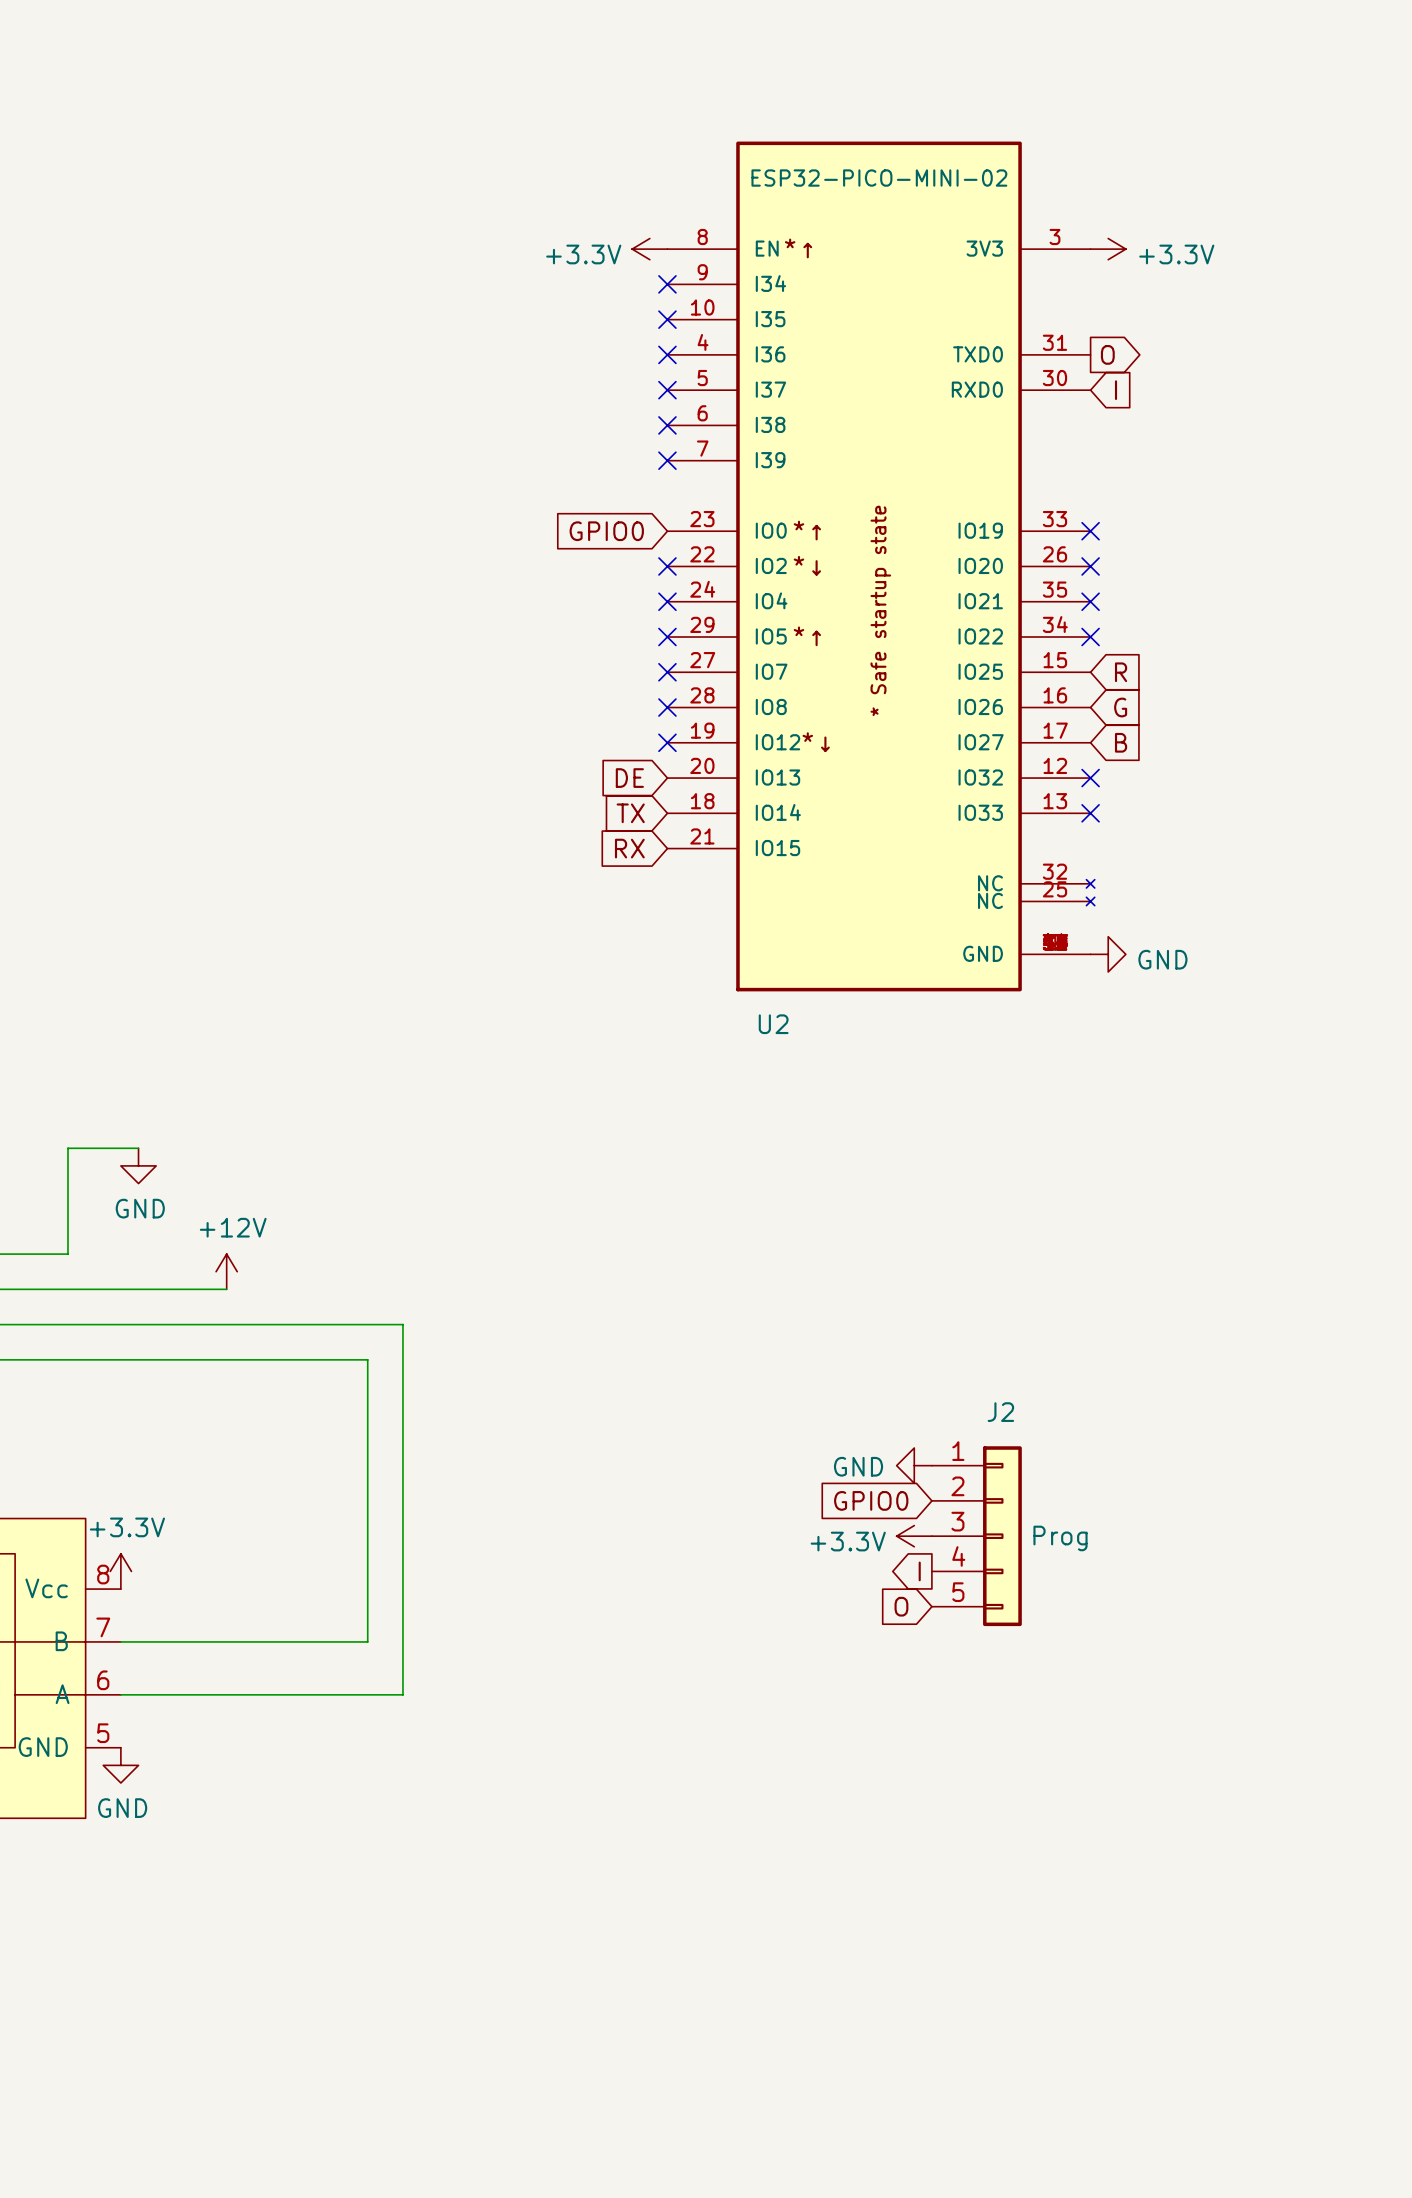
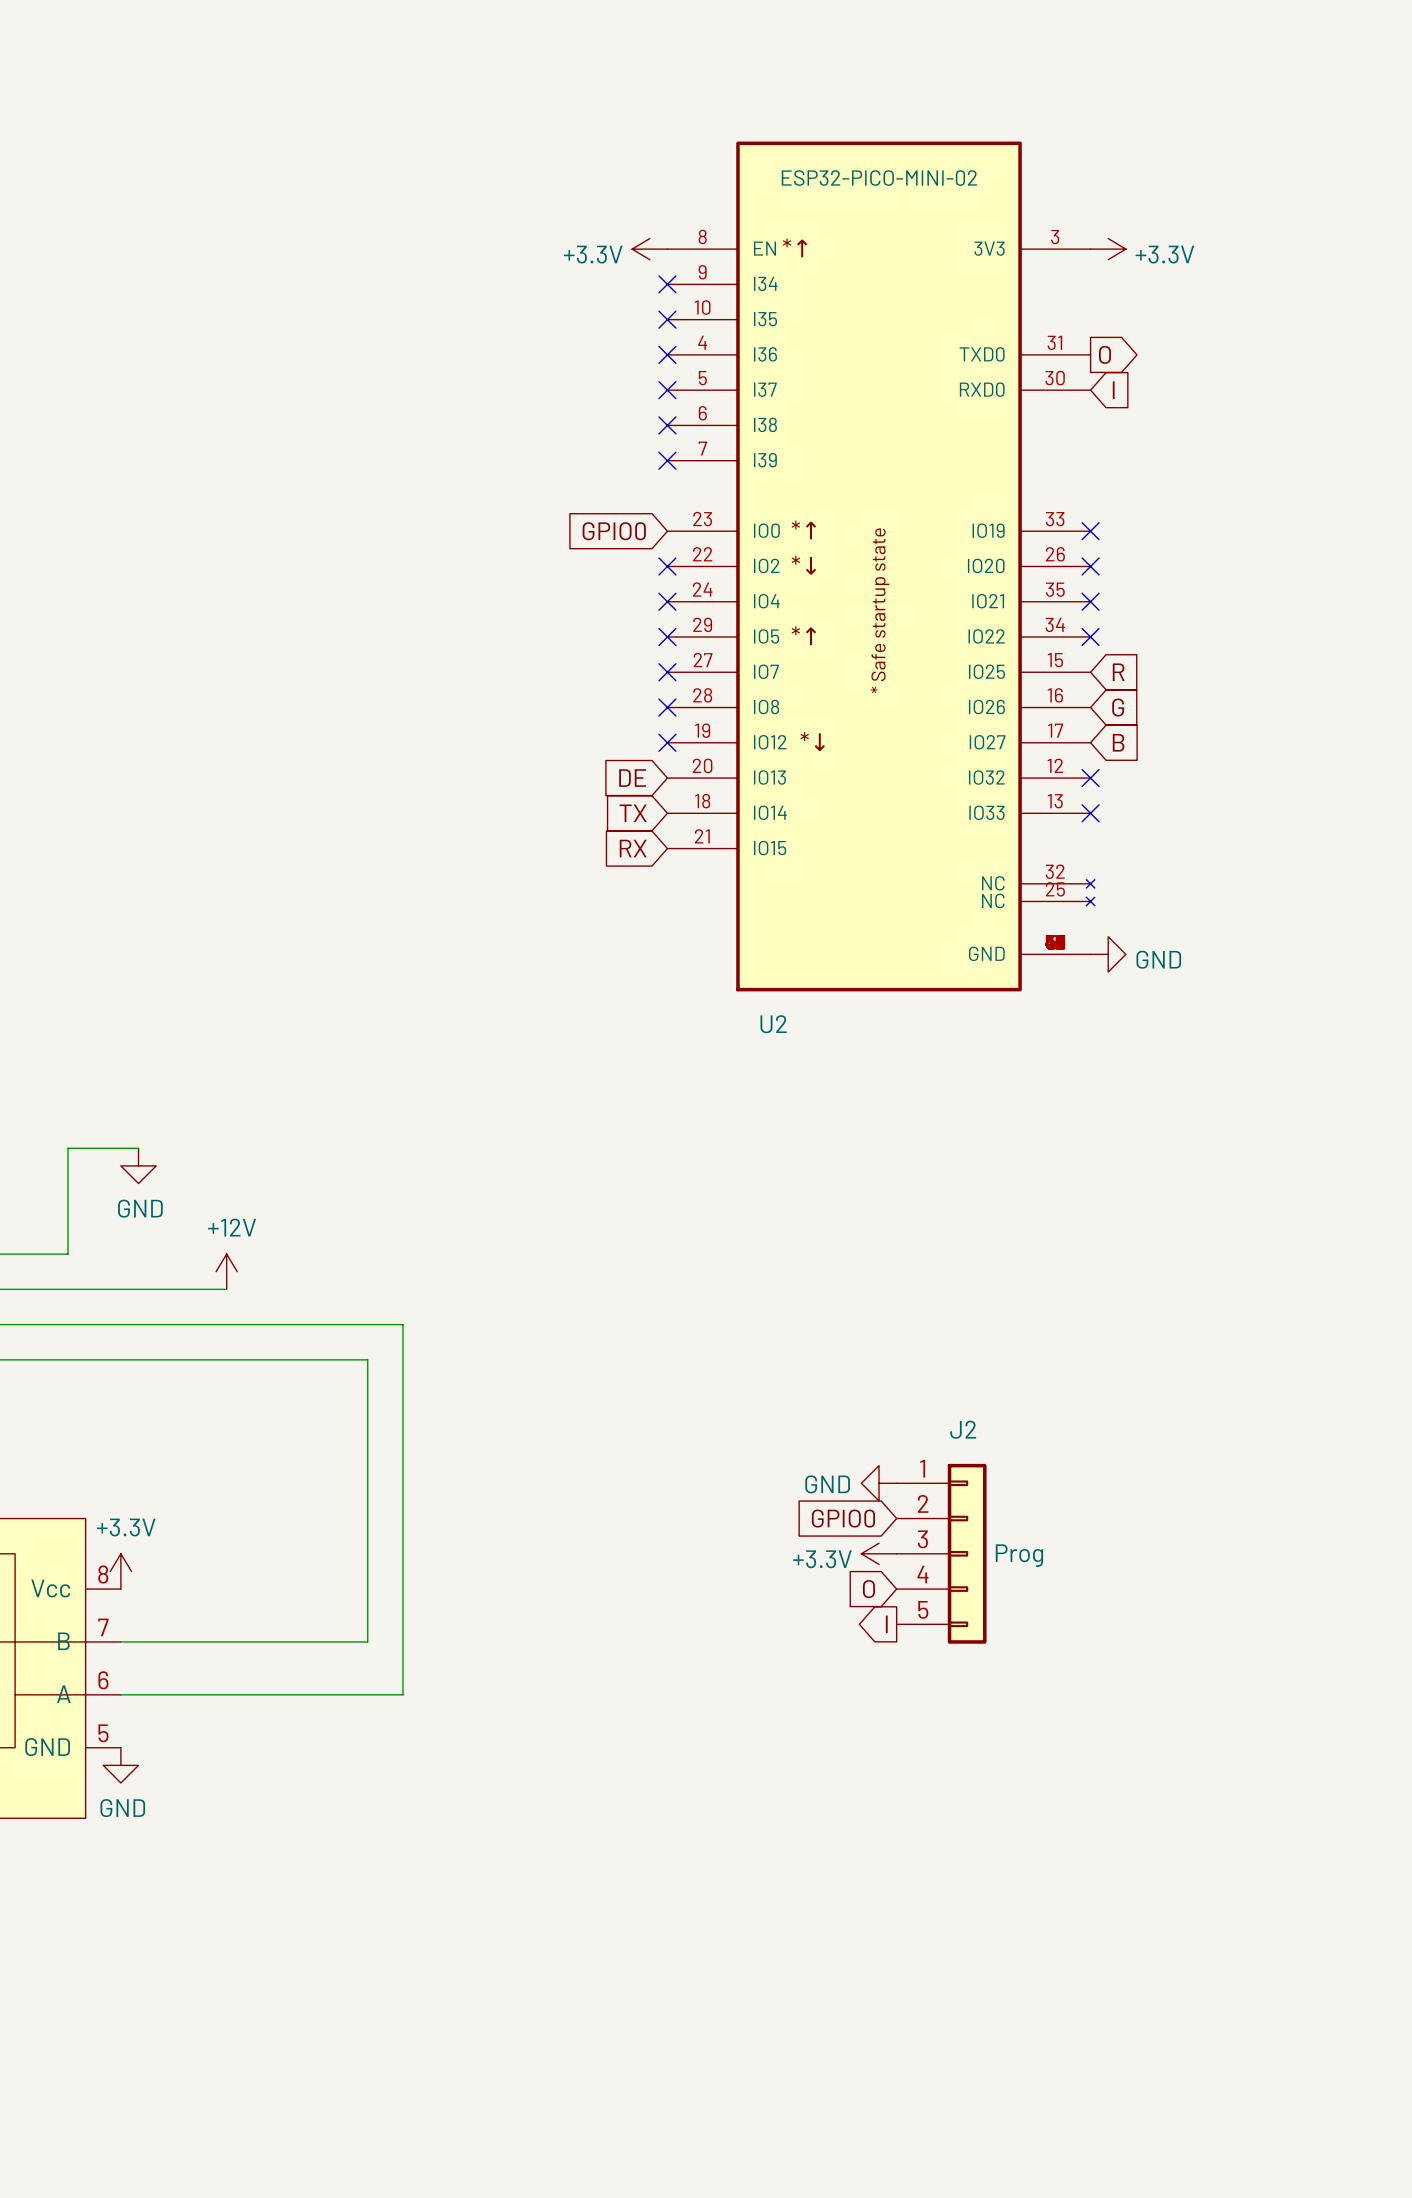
power symbol position: GND (914, 1465) -> GND (879, 1483)
global label position: GPIO0 (871, 1500) -> GPIO0 (843, 1518)
power symbol position: +3.3V (914, 1536) -> +3.3V (879, 1553)
J2 position: (976, 1536) -> (941, 1553)
global label position: I (919, 1571) -> I (886, 1624)
global label position: O (901, 1606) -> O (868, 1589)

